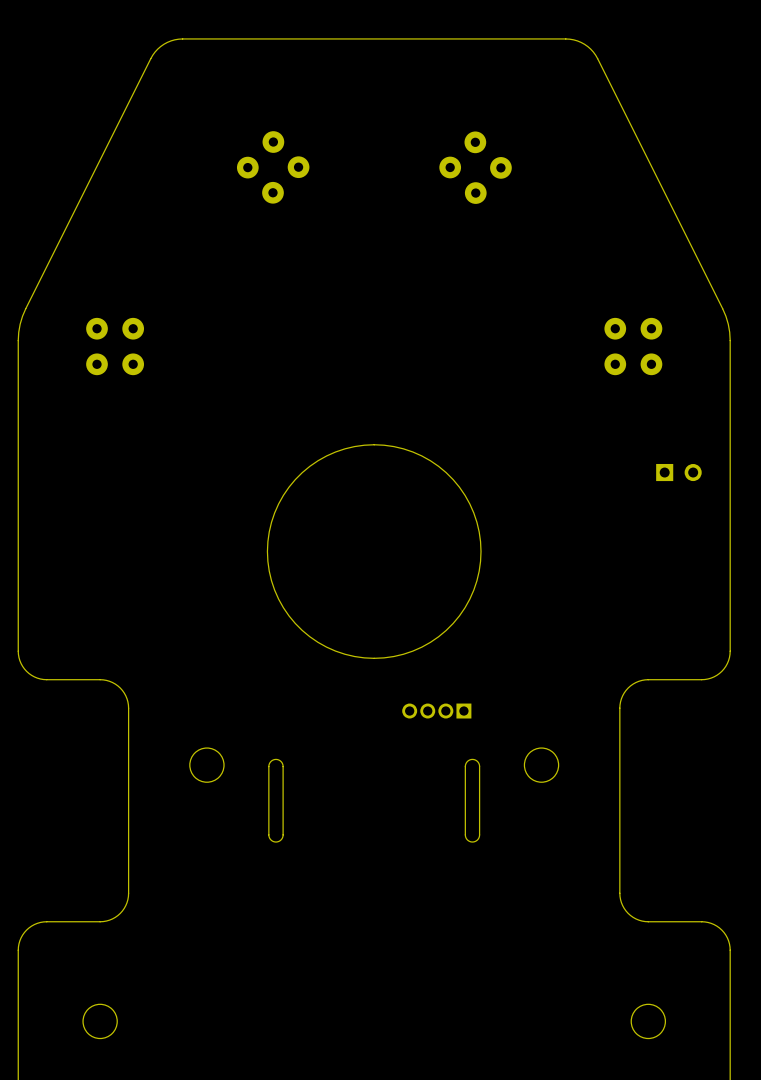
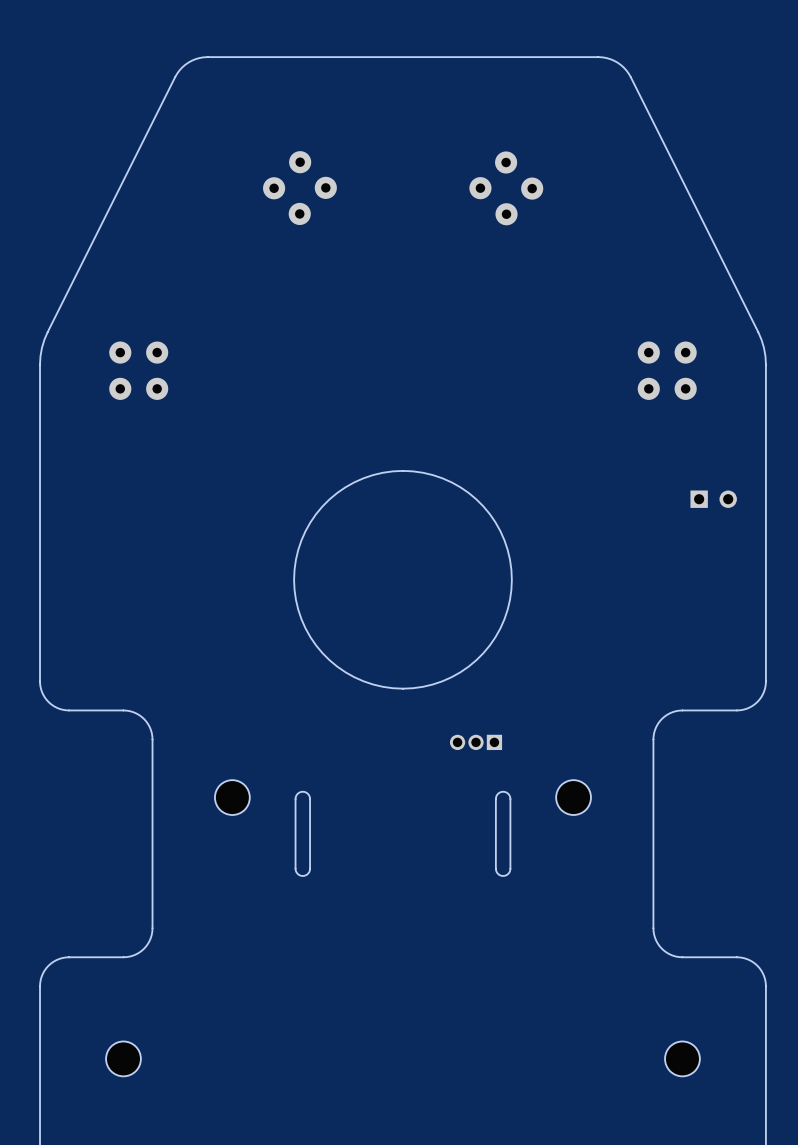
part footprint: [402, 703, 472, 719] -> [449, 734, 503, 751]

